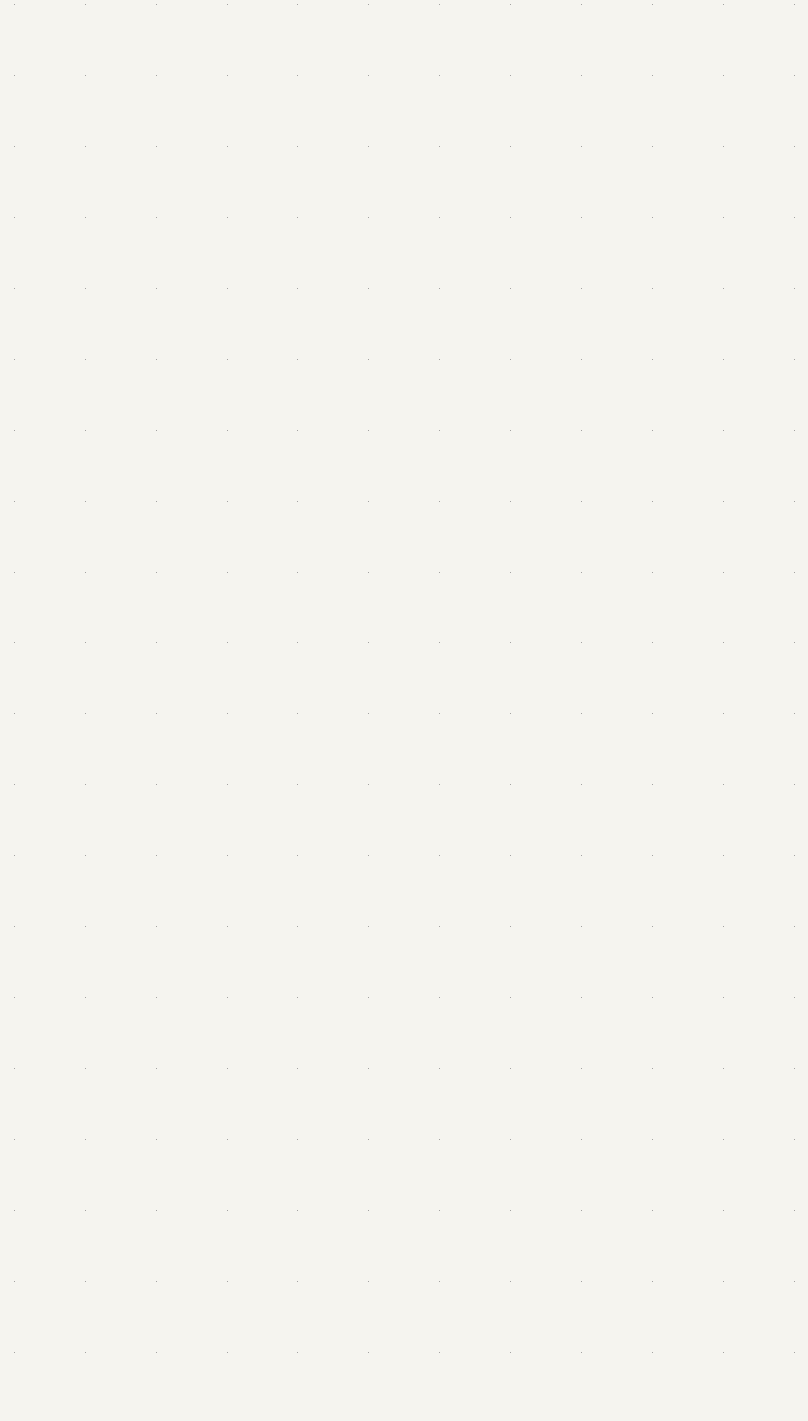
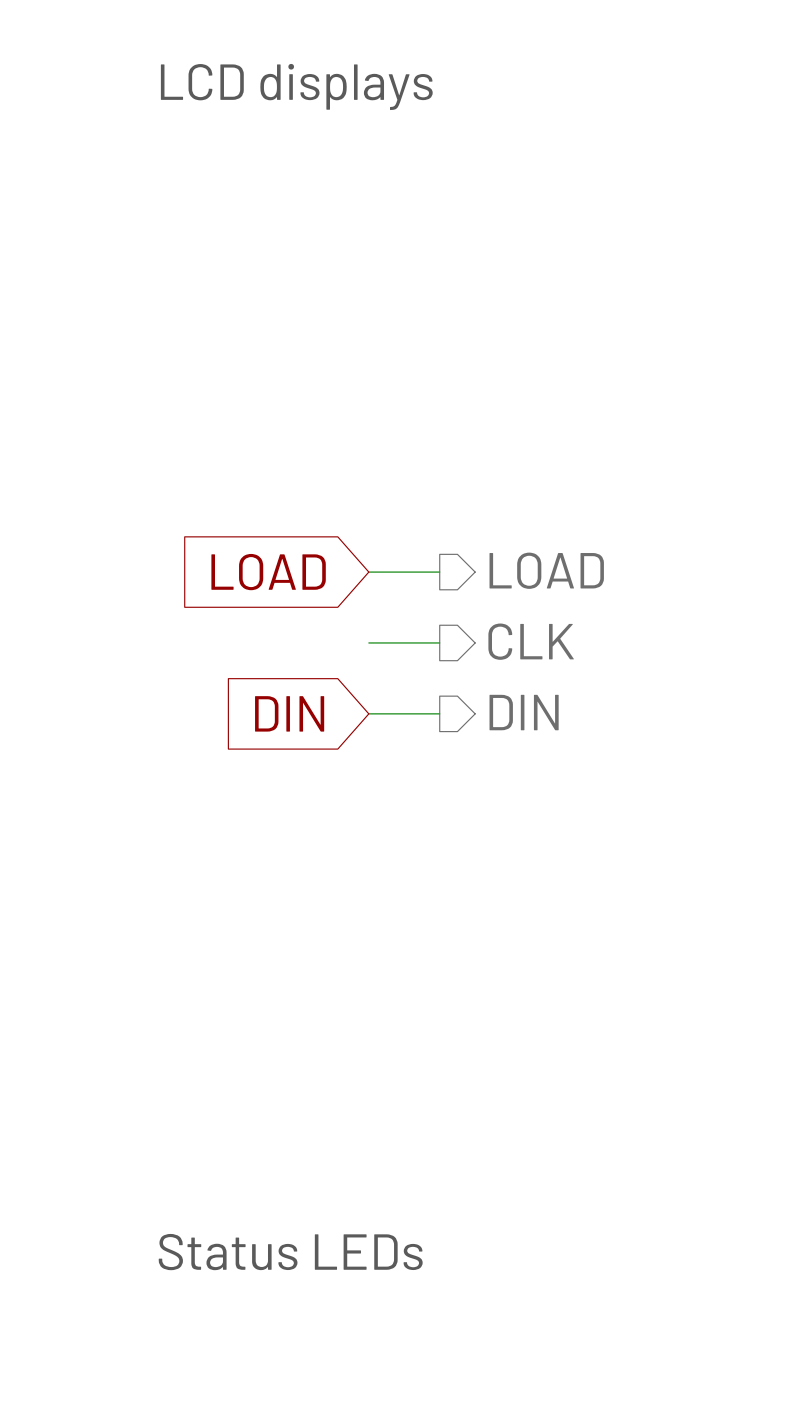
text: none -> LCD displays (296, 86)
sheet pin: none -> LOAD (546, 570)
global label: none -> LOAD (268, 572)
wire: none -> (368, 572) (439, 572)
sheet pin: none -> CLK (531, 641)
wire: none -> (368, 642) (439, 642)
sheet pin: none -> DIN (524, 712)
global label: none -> DIN (289, 713)
wire: none -> (368, 713) (439, 713)
text: none -> Status LEDs (290, 1252)

